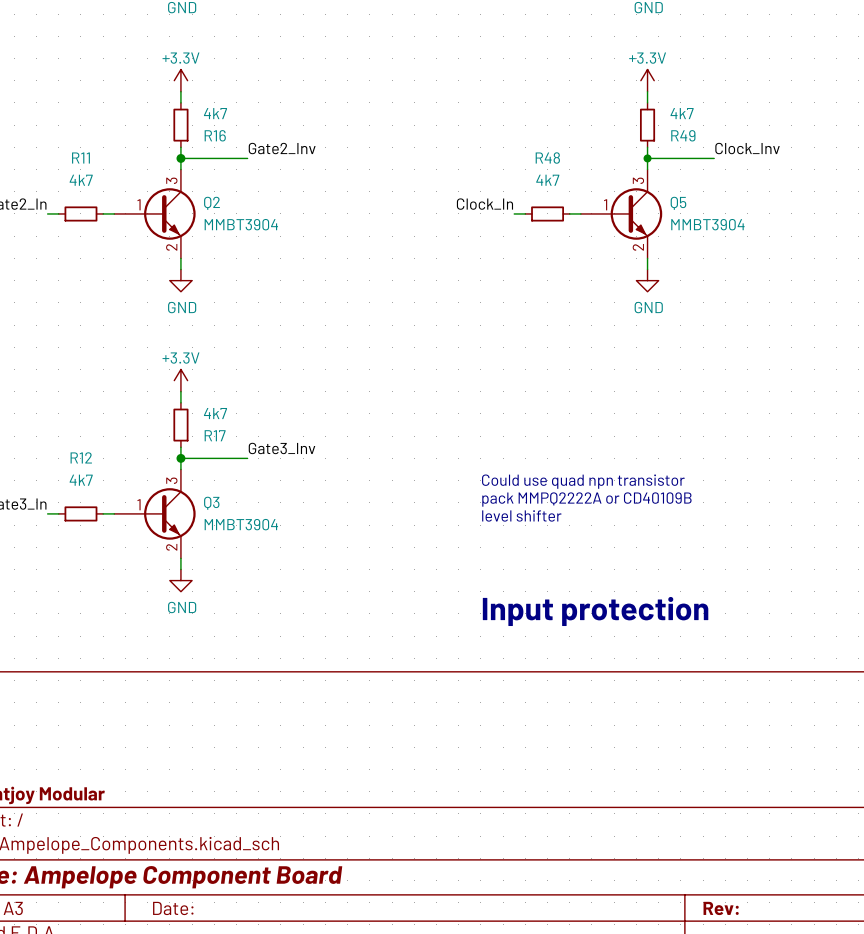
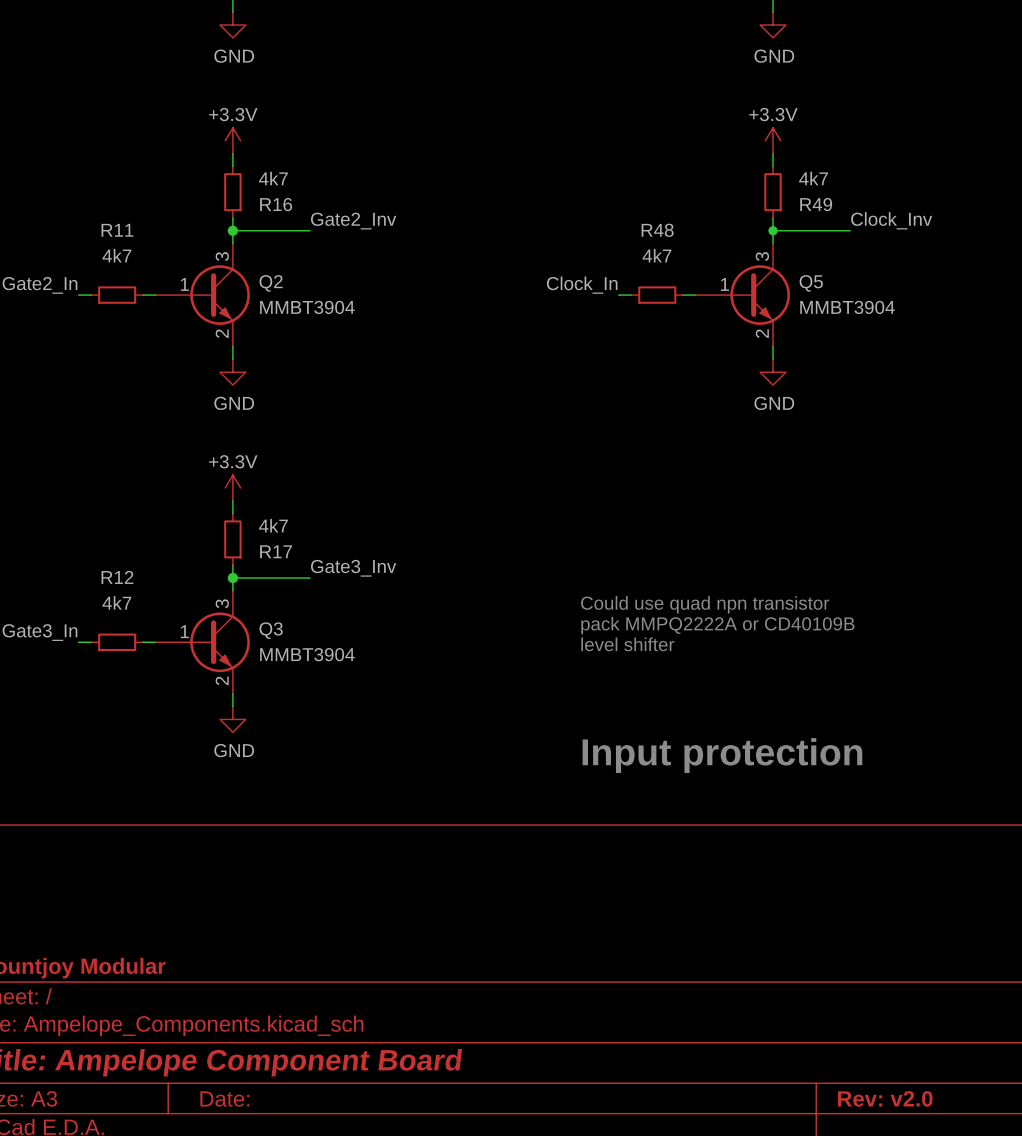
title block: Rev: (721, 908) -> Rev: v2.0 (885, 1098)

